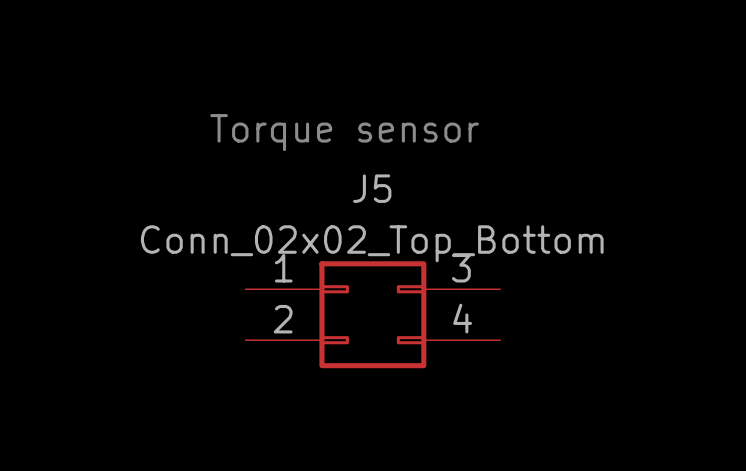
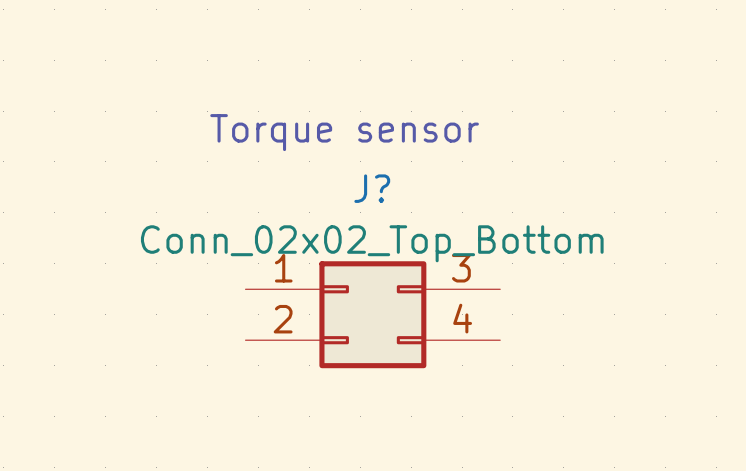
J5 name: J5 (372, 188) -> J? (372, 188)

